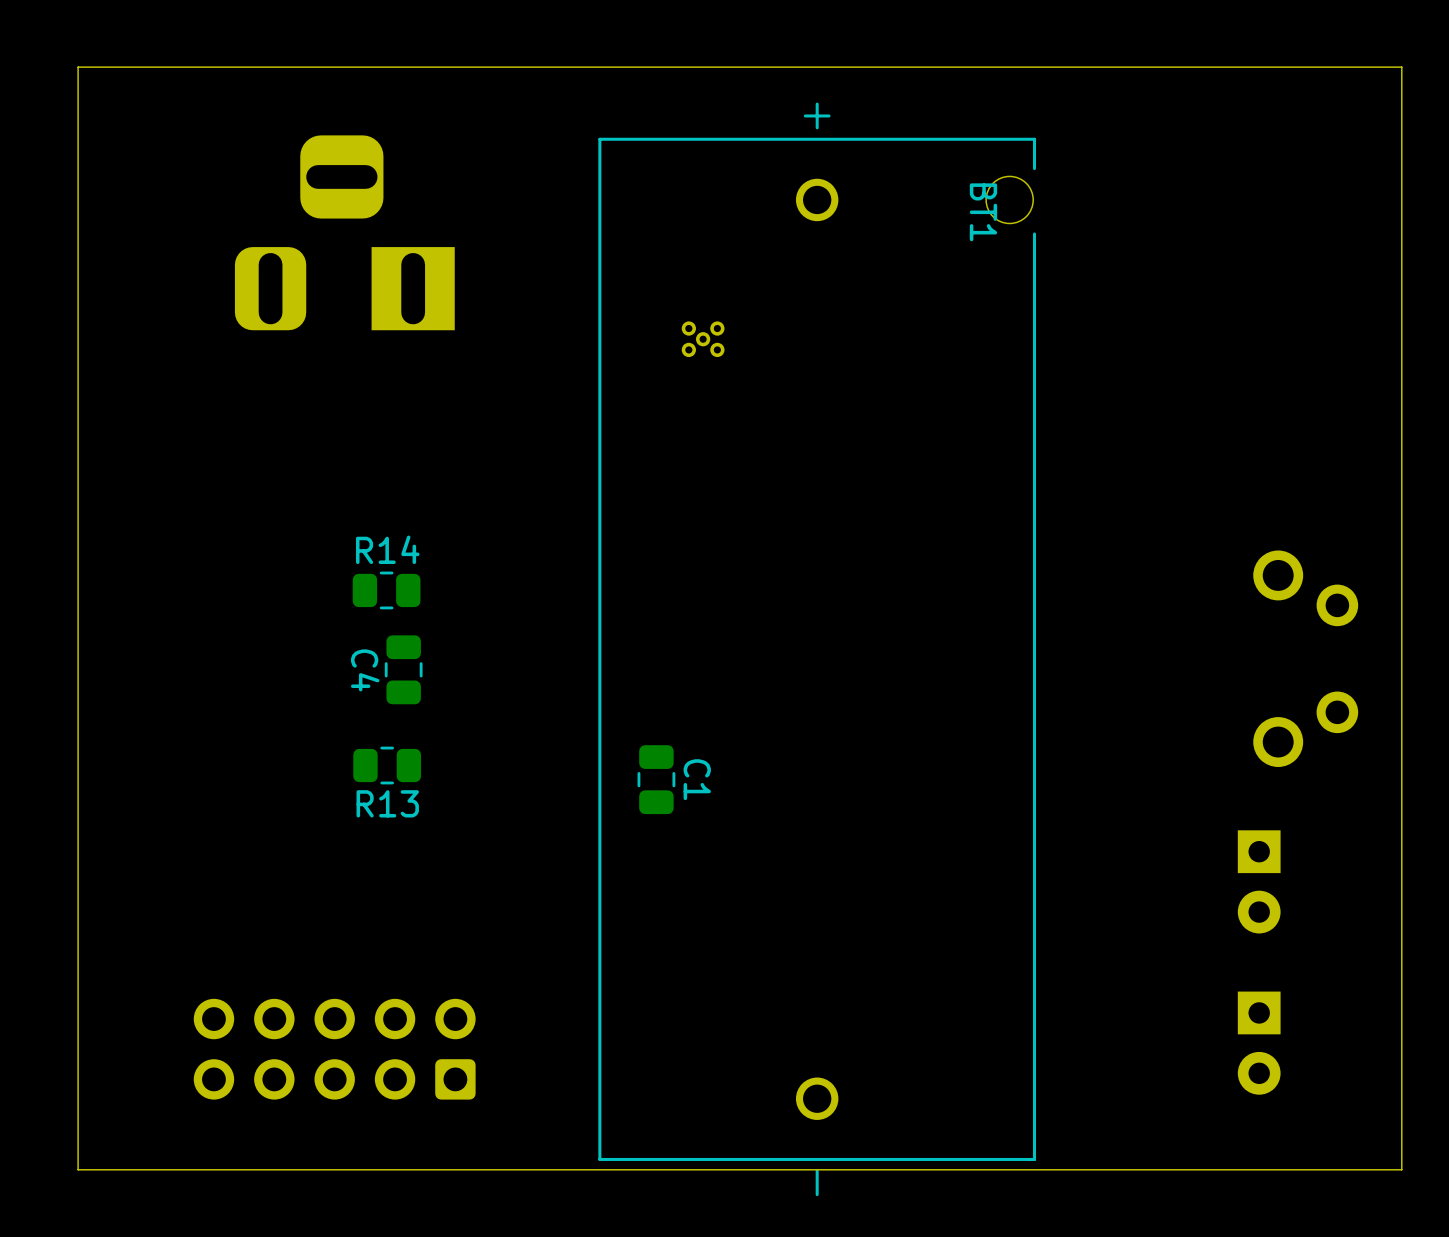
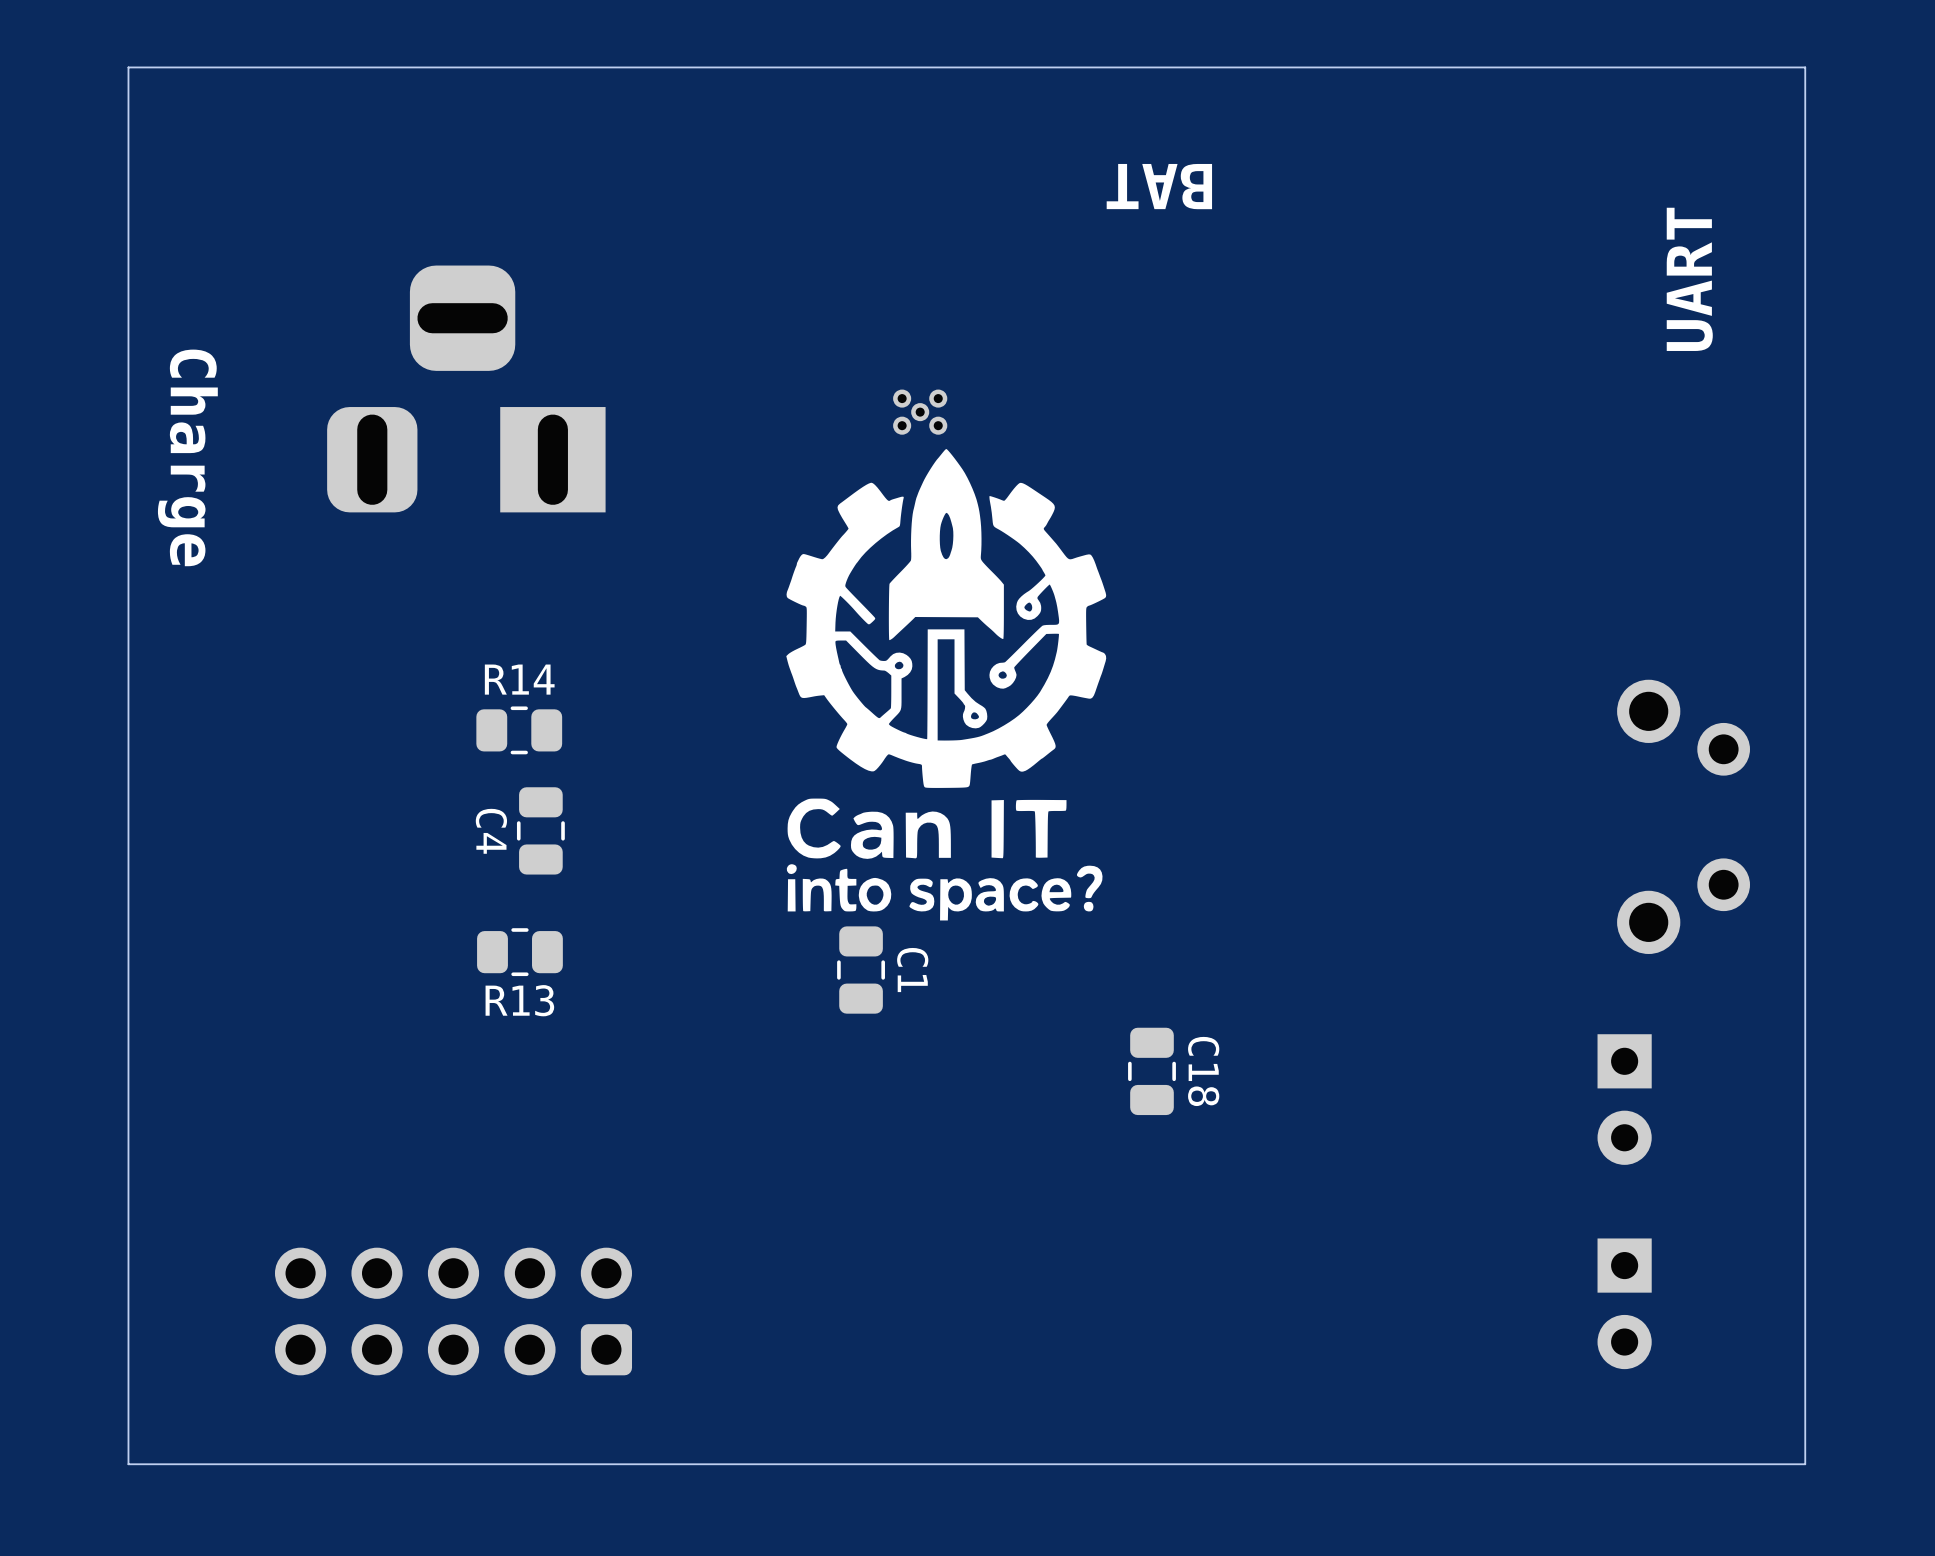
text: none -> BAT (1159, 186)
text: none -> UART (1689, 279)
part position: (344, 232) -> (466, 388)
drawing: none -> [786, 449, 1107, 921]
text: none -> Charge (187, 457)
BT1: (817, 649) -> none
C18: none -> (1151, 1071)

